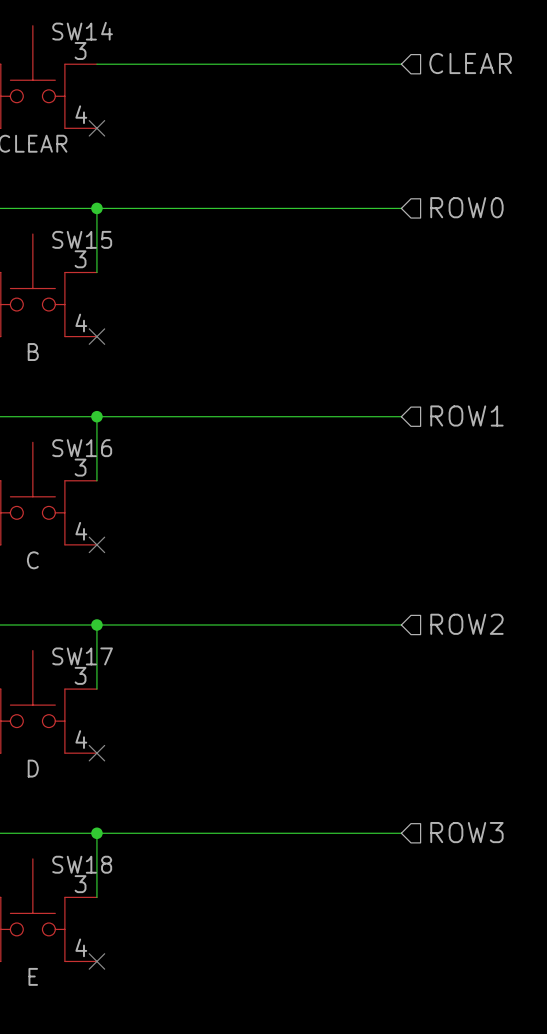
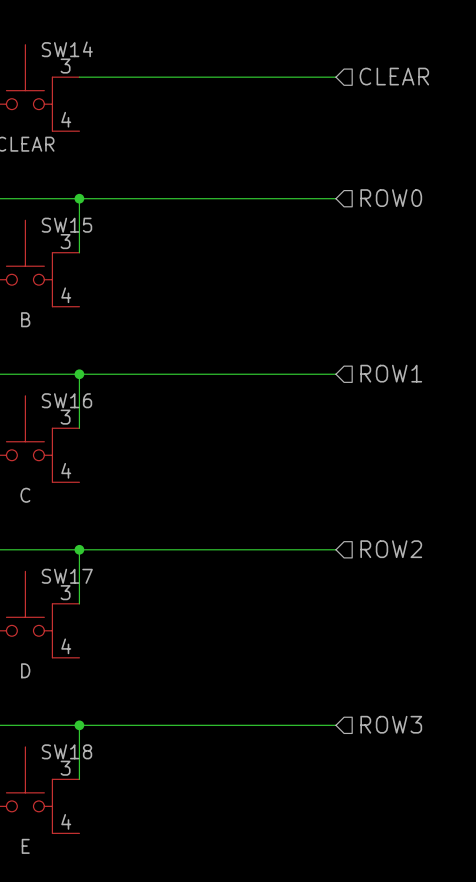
no-connect mark: (96, 128) -> none
no-connect mark: (96, 336) -> none
no-connect mark: (96, 544) -> none
no-connect mark: (96, 753) -> none
no-connect mark: (96, 961) -> none

